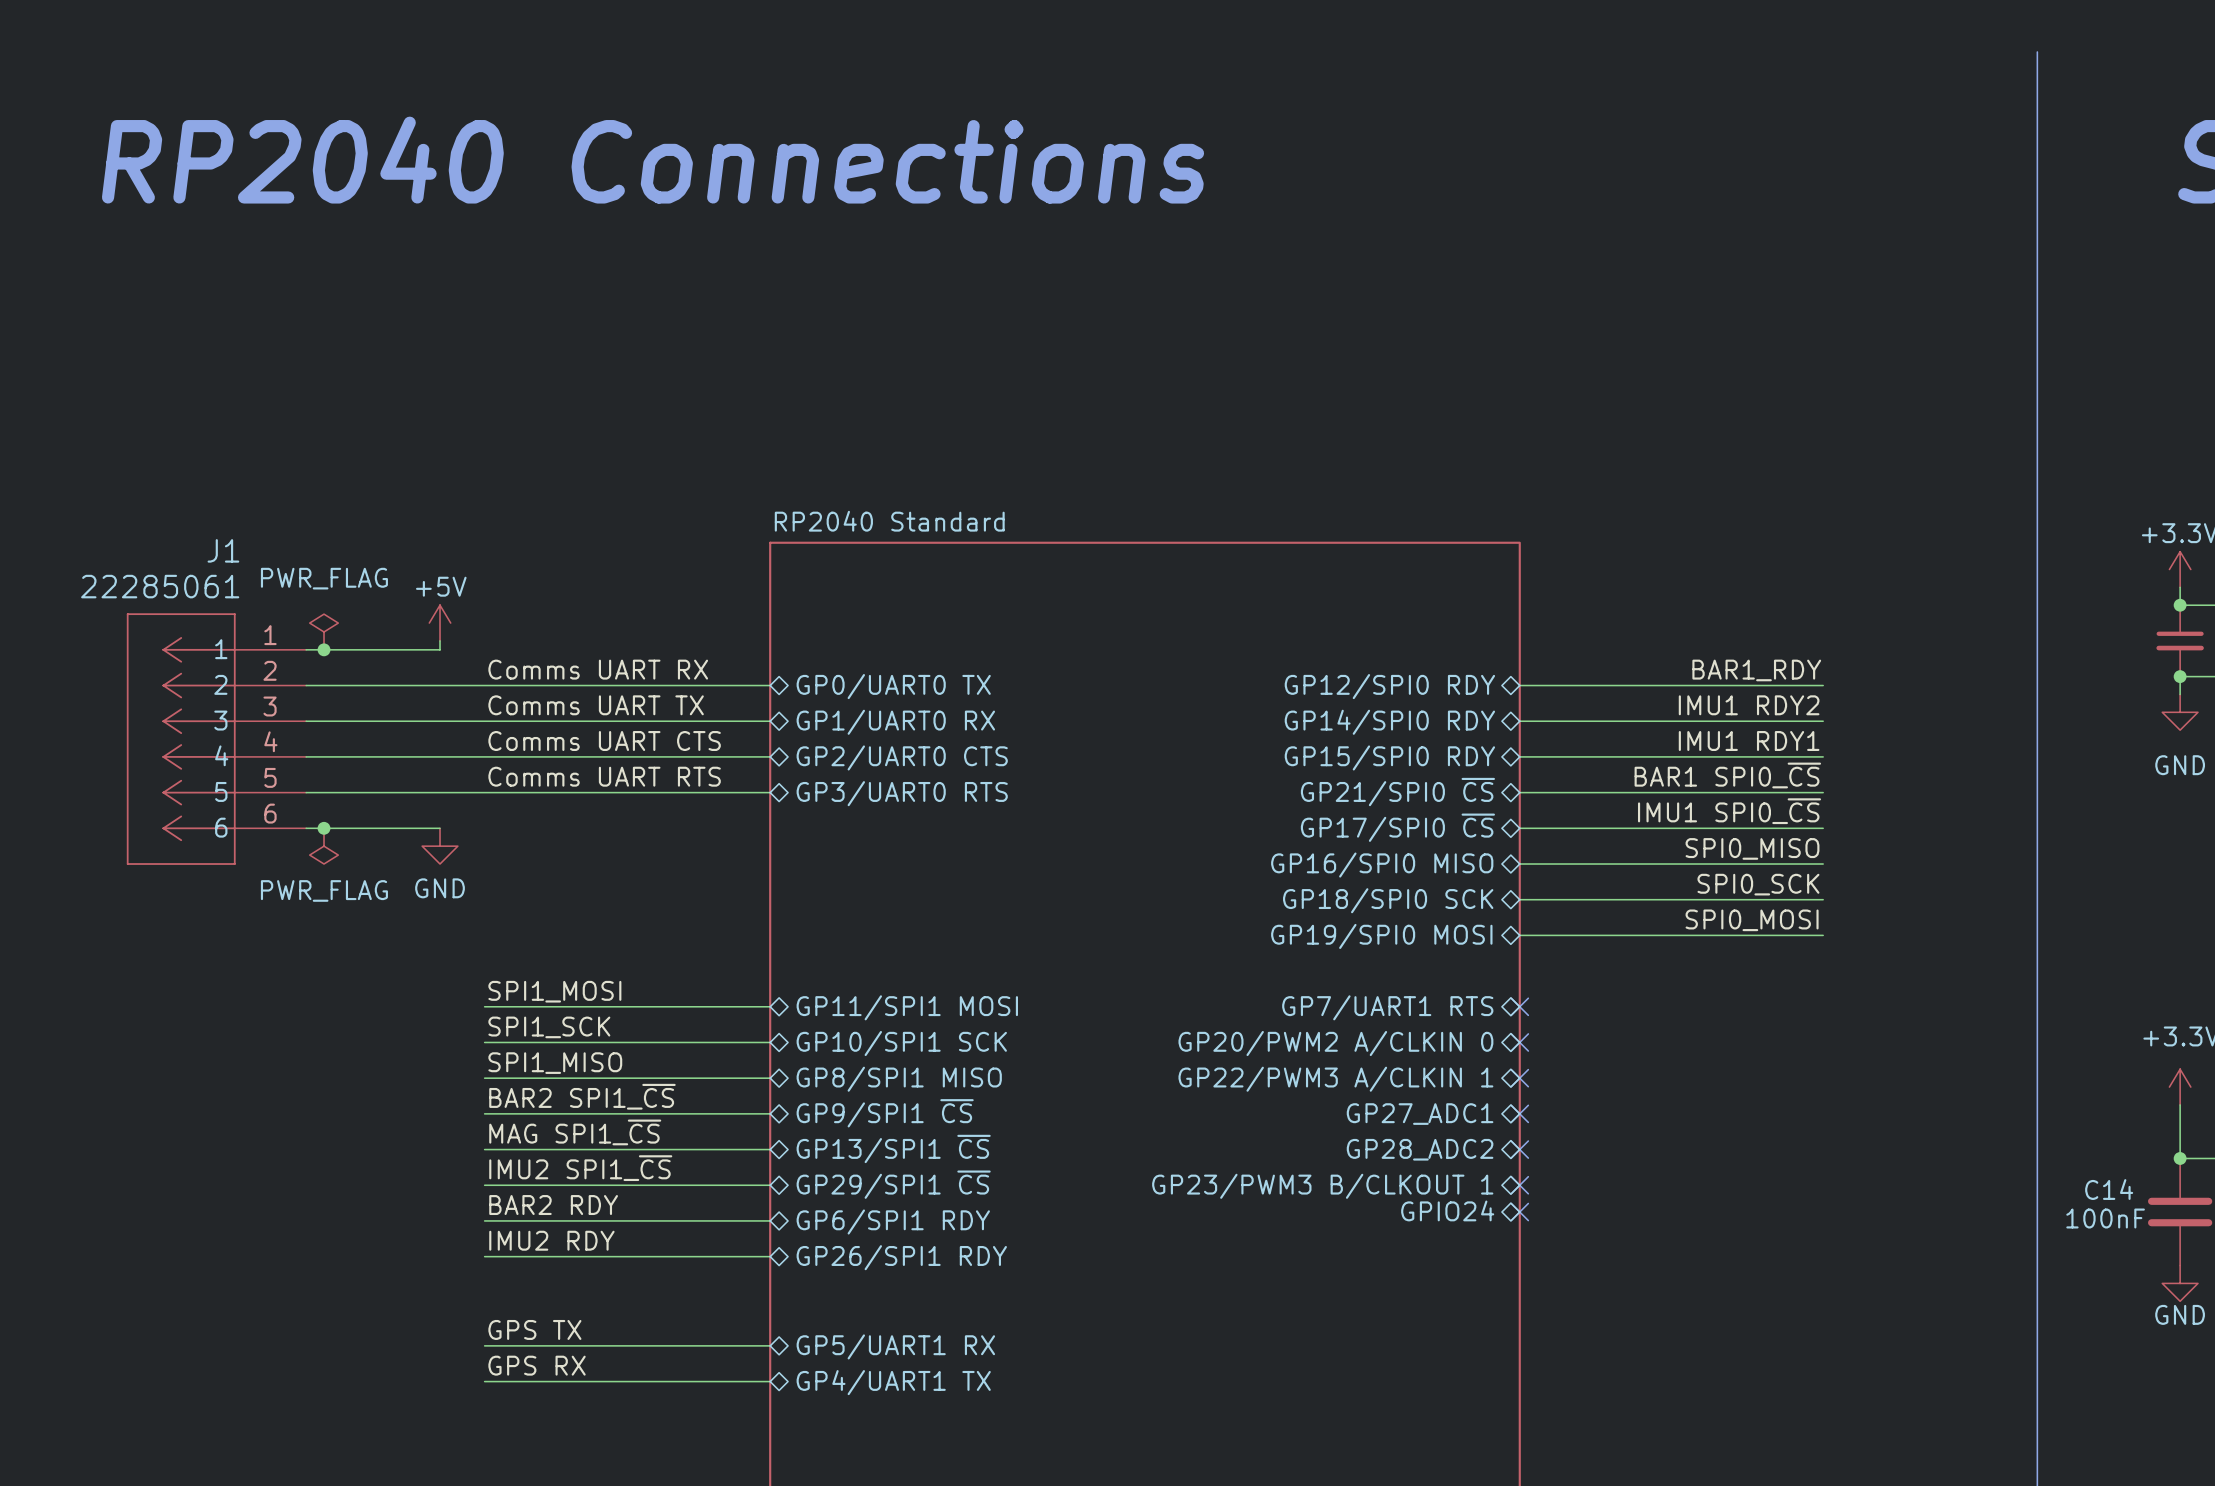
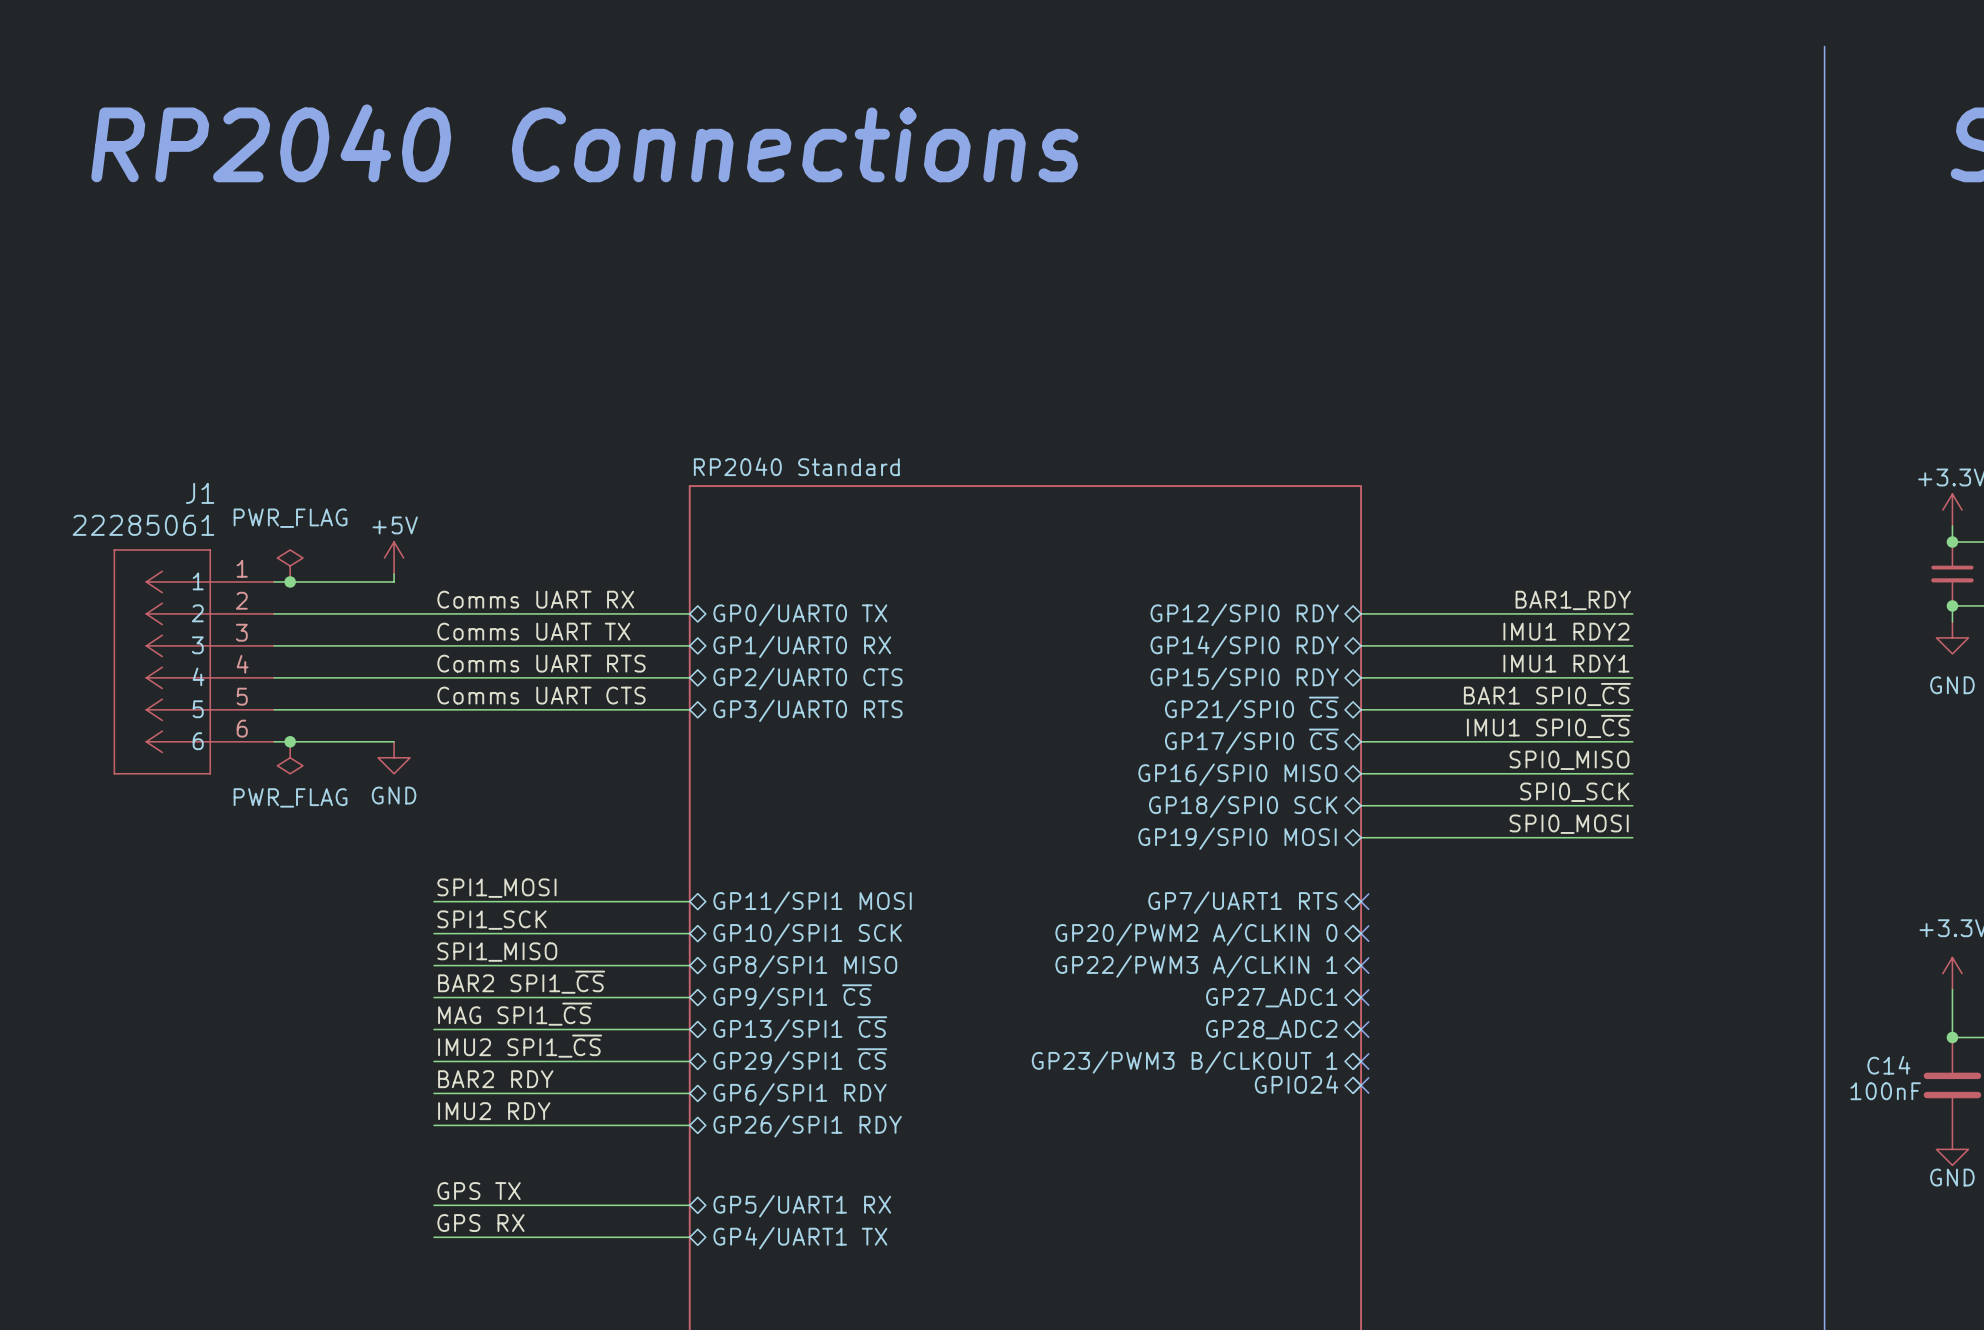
label: Comms UART CTS (604, 741) -> Comms UART RTS (541, 663)
label: Comms UART RTS (604, 776) -> Comms UART CTS (541, 695)

